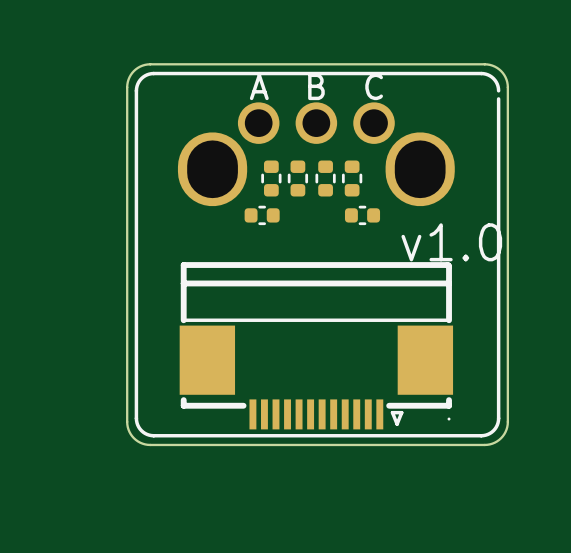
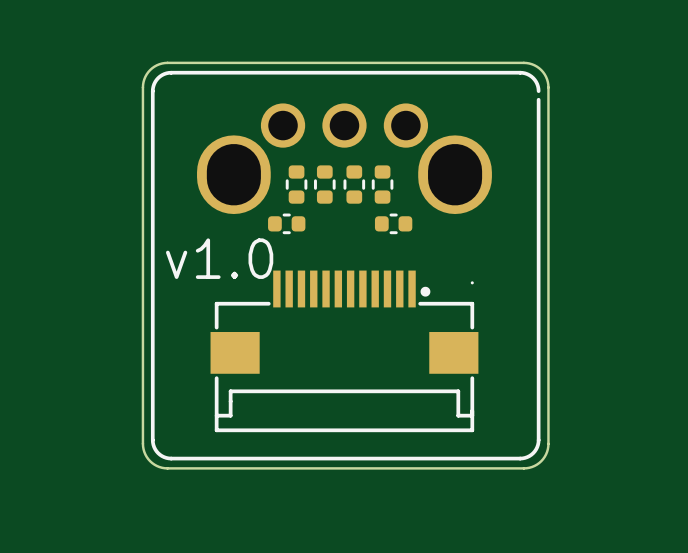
text: A B C (316, 86) -> none
text position: v1.0 (451, 242) -> v1.0 (219, 258)
part footprint: [179, 262, 454, 430] -> [210, 270, 479, 433]

